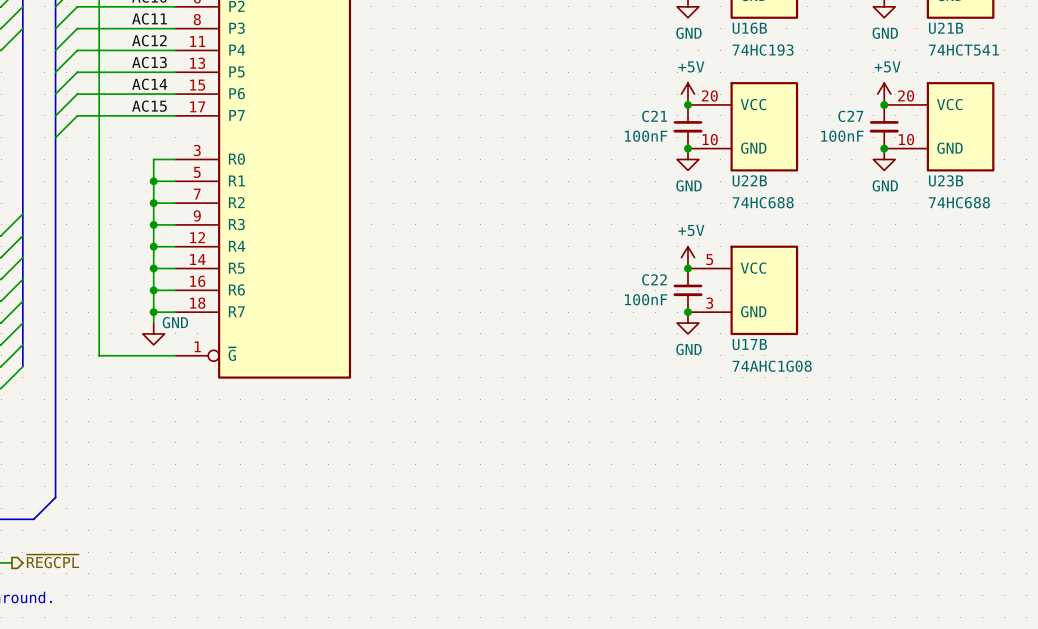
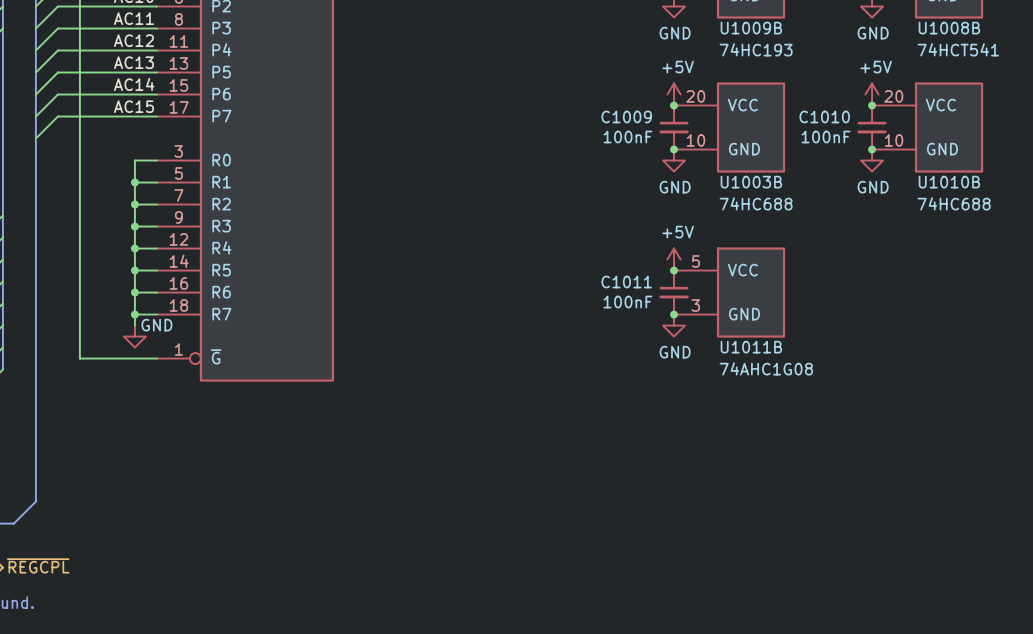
U16B name: U16B (749, 28) -> U1009B (751, 28)
U21B name: U21B (946, 28) -> U1008B (949, 28)
C21 name: C21 (654, 116) -> C1009 (626, 116)
C27 name: C27 (850, 116) -> C1010 (824, 116)
U22B name: U22B (749, 180) -> U1003B (751, 182)
U23B name: U23B (946, 180) -> U1010B (949, 182)
C22 name: C22 (654, 279) -> C1011 (626, 282)
U17B name: U17B (749, 344) -> U1011B (751, 347)

